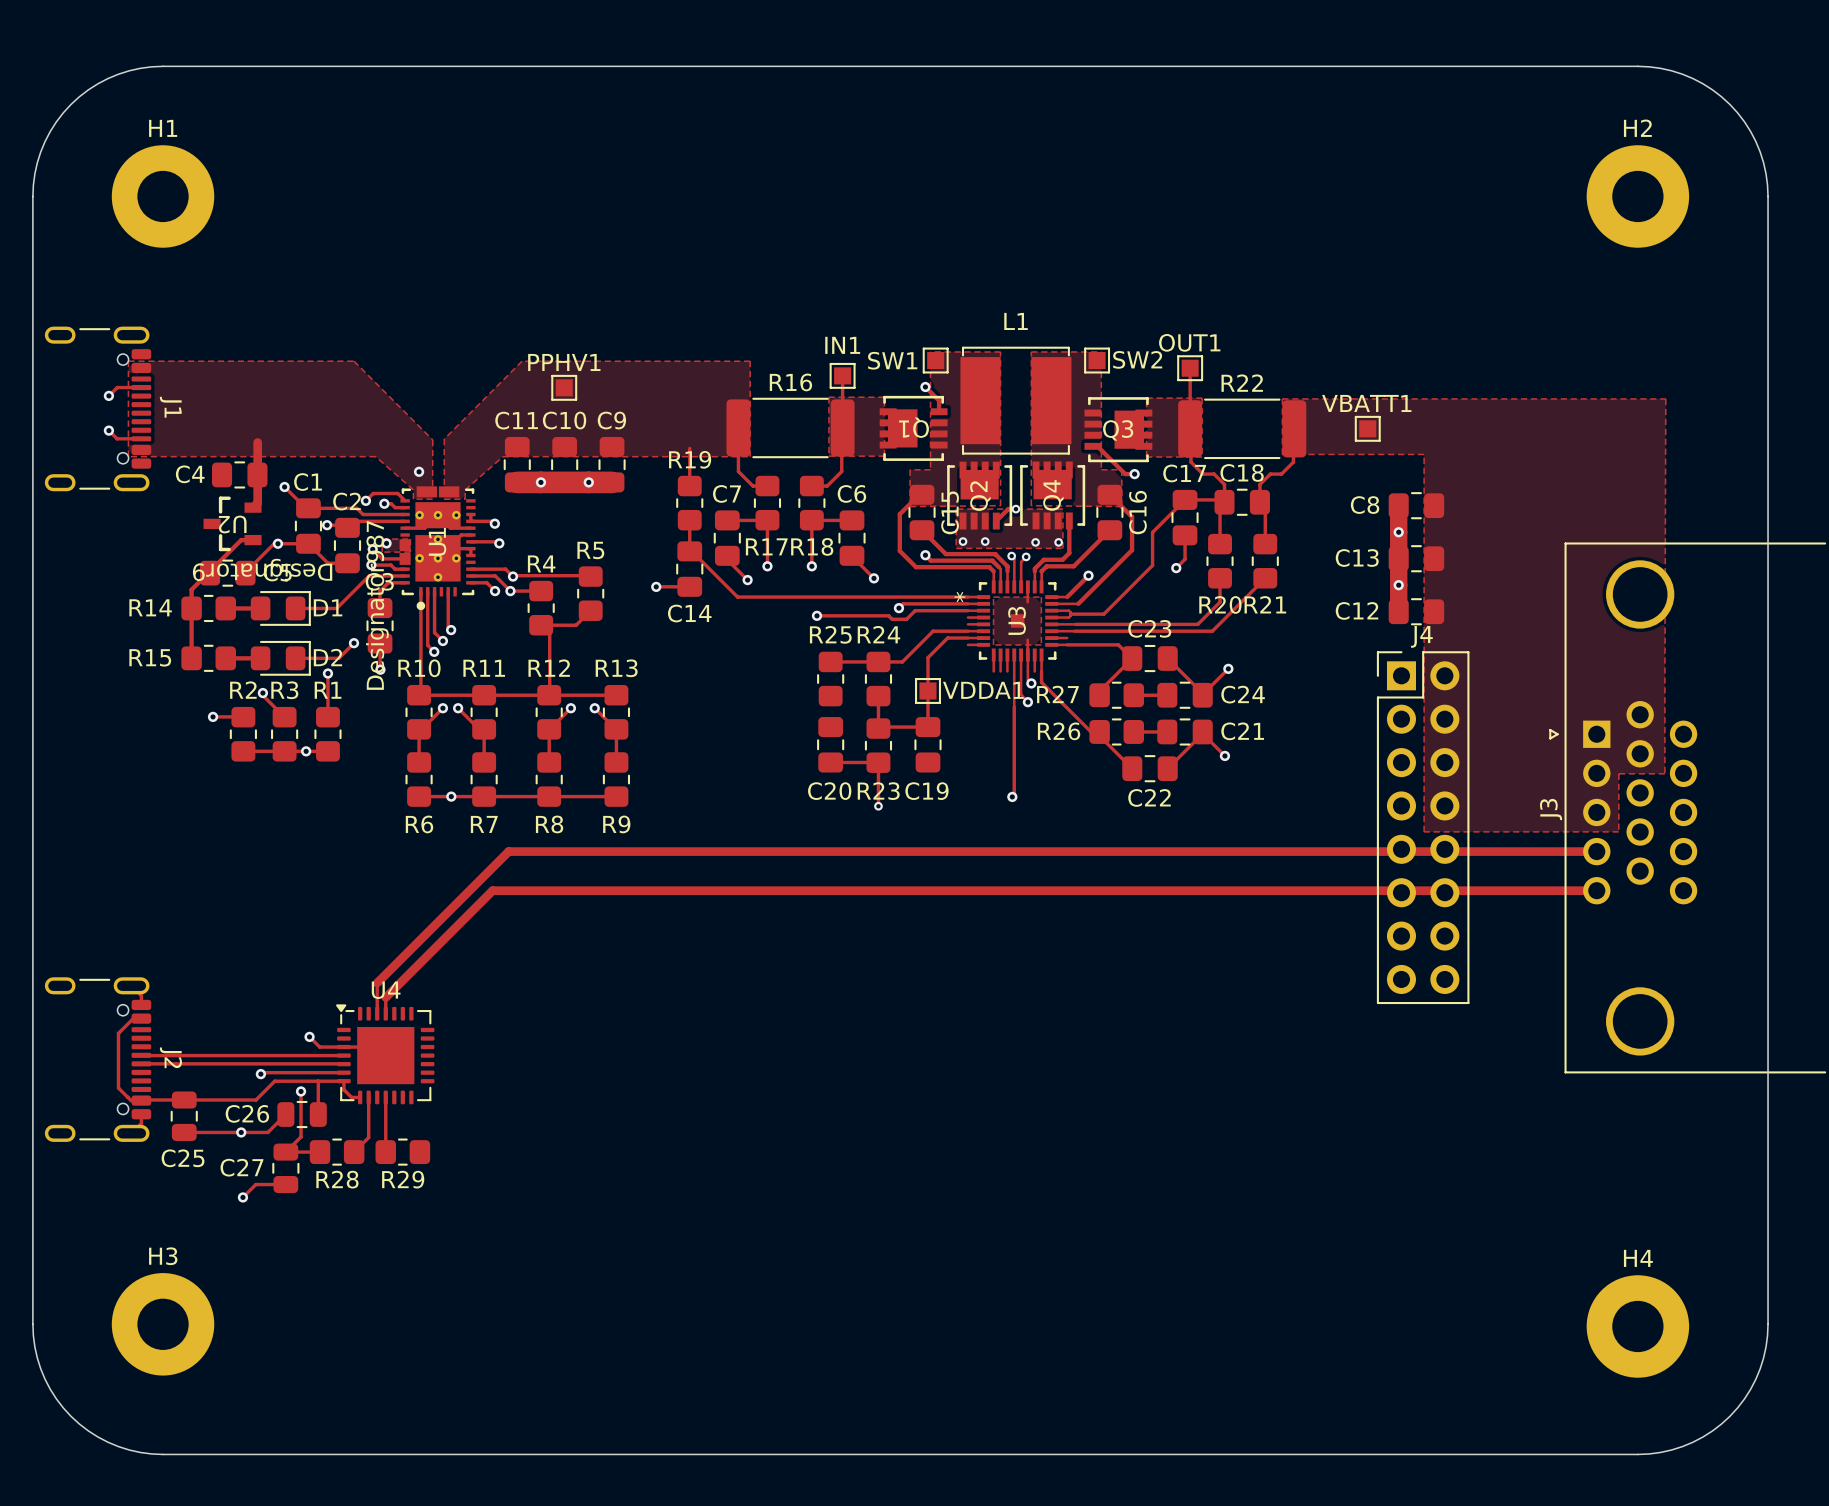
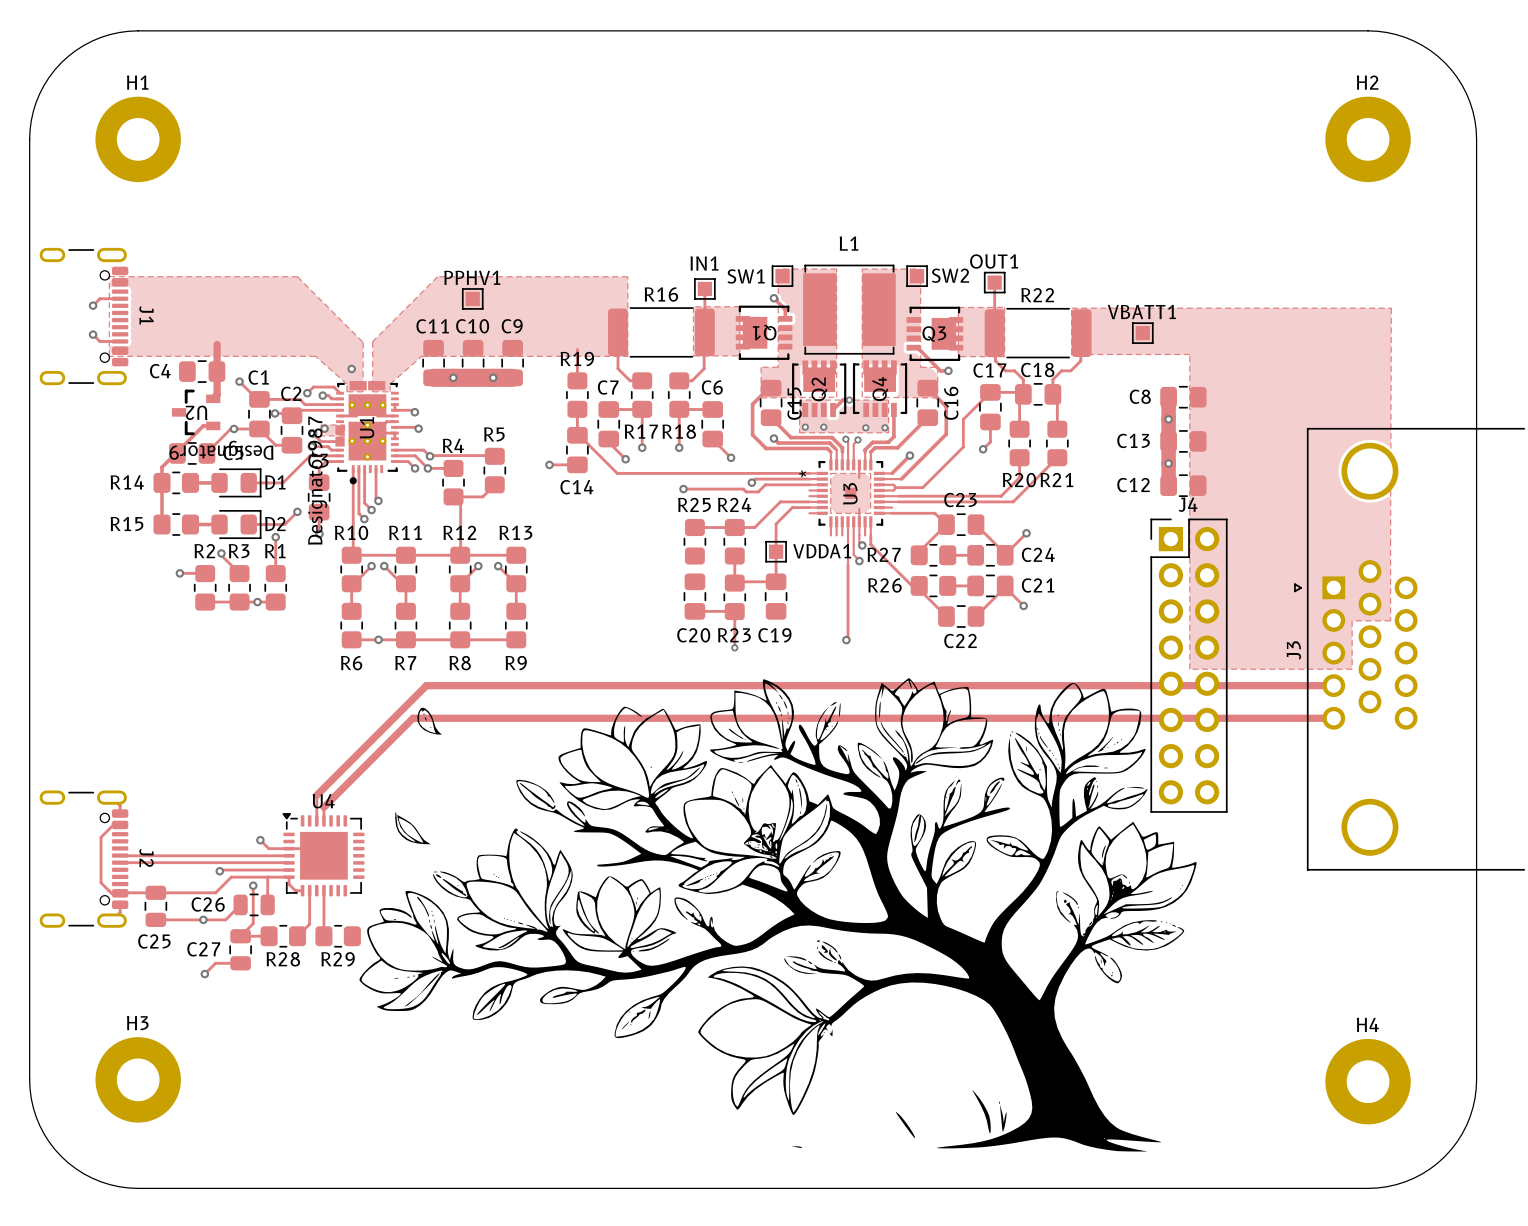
drawing: none -> [359, 678, 1197, 1152]

